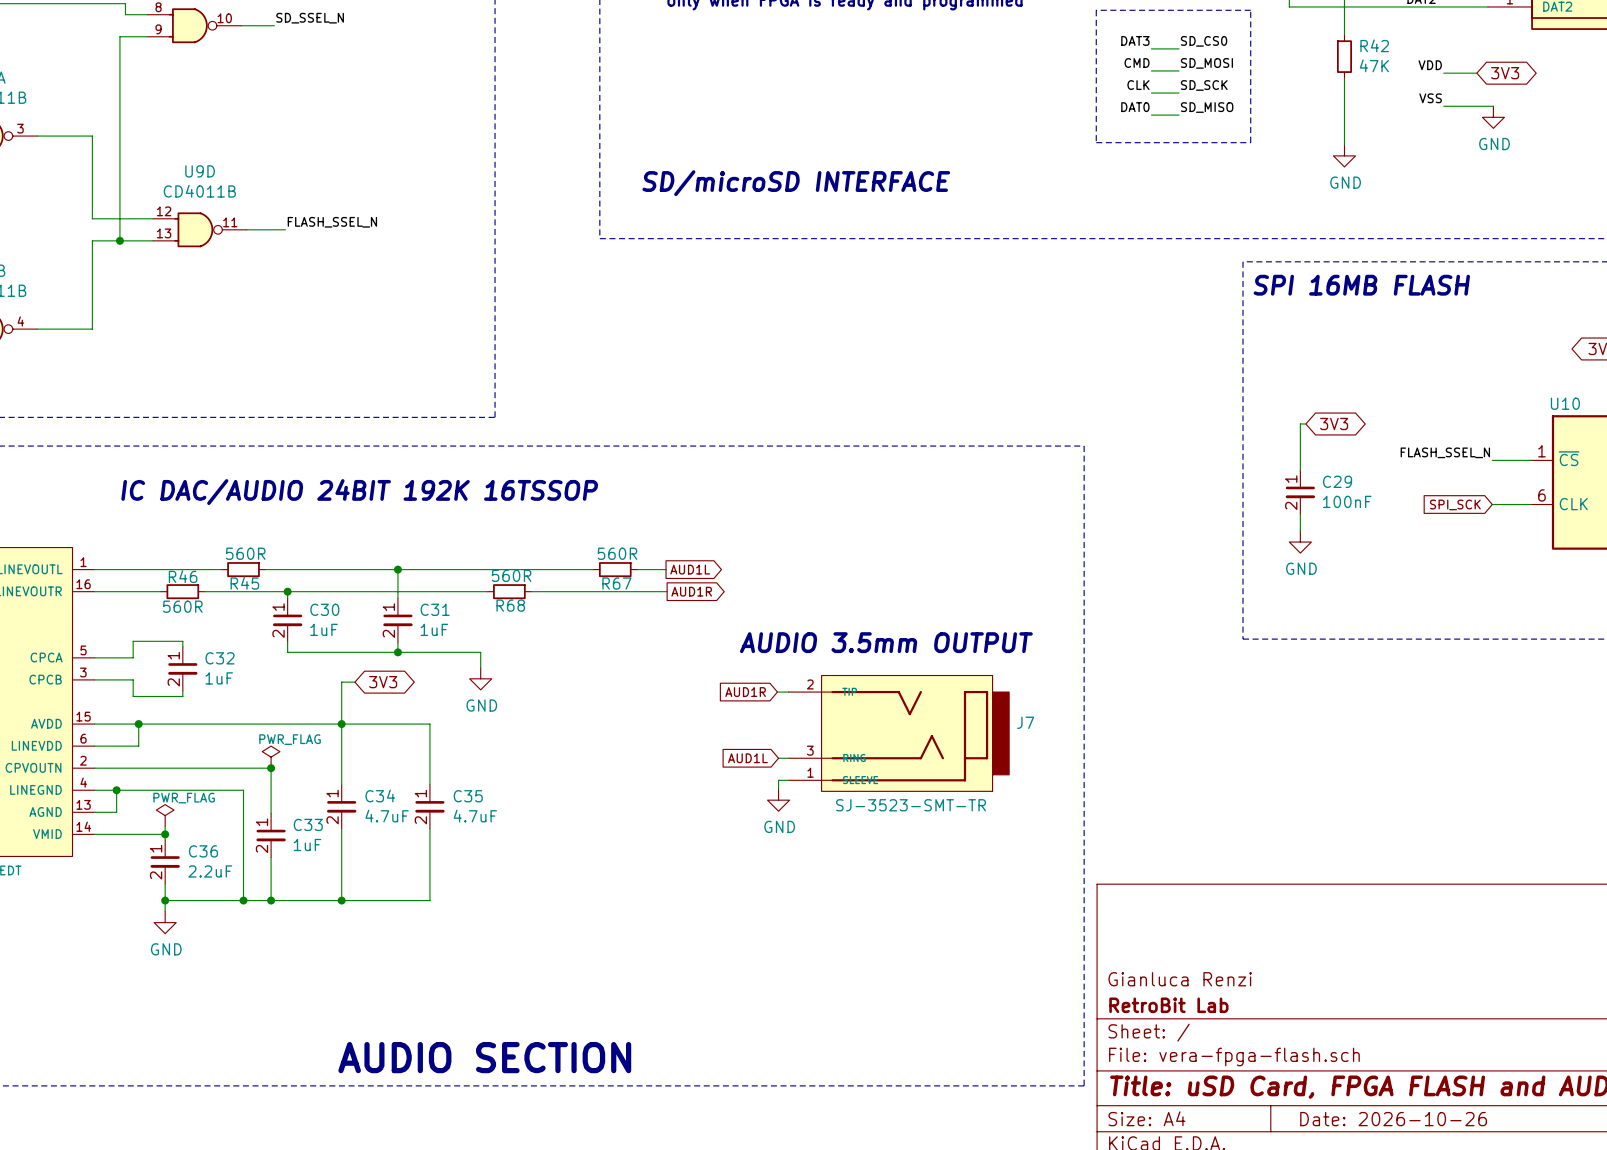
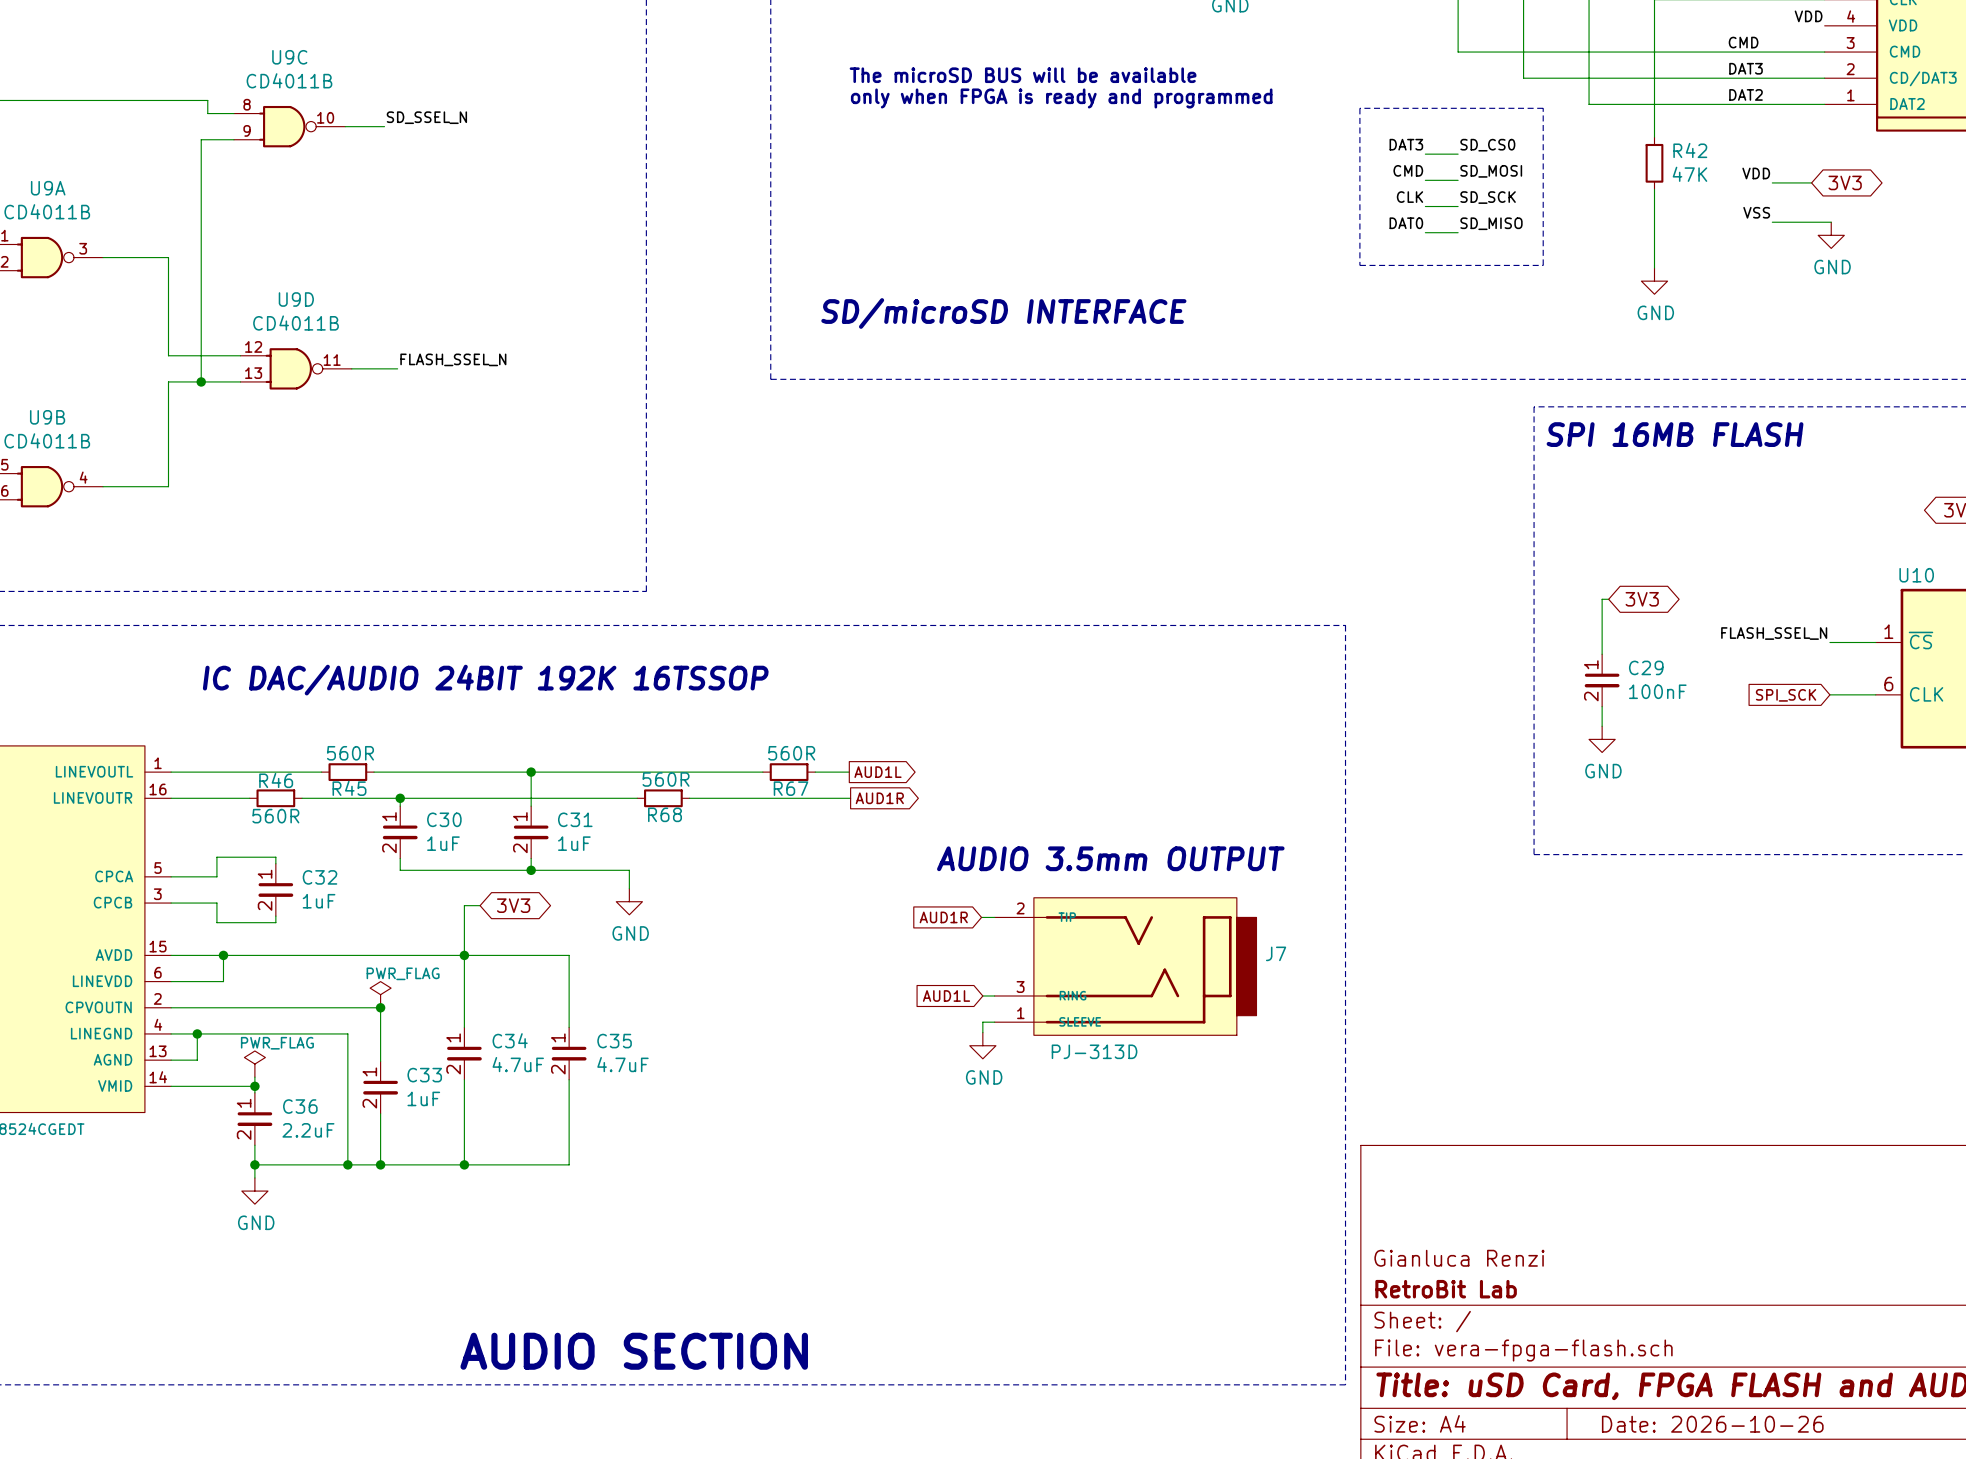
J7 value: SJ-3523-SMT-TR (911, 805) -> PJ-313D (1094, 1051)

